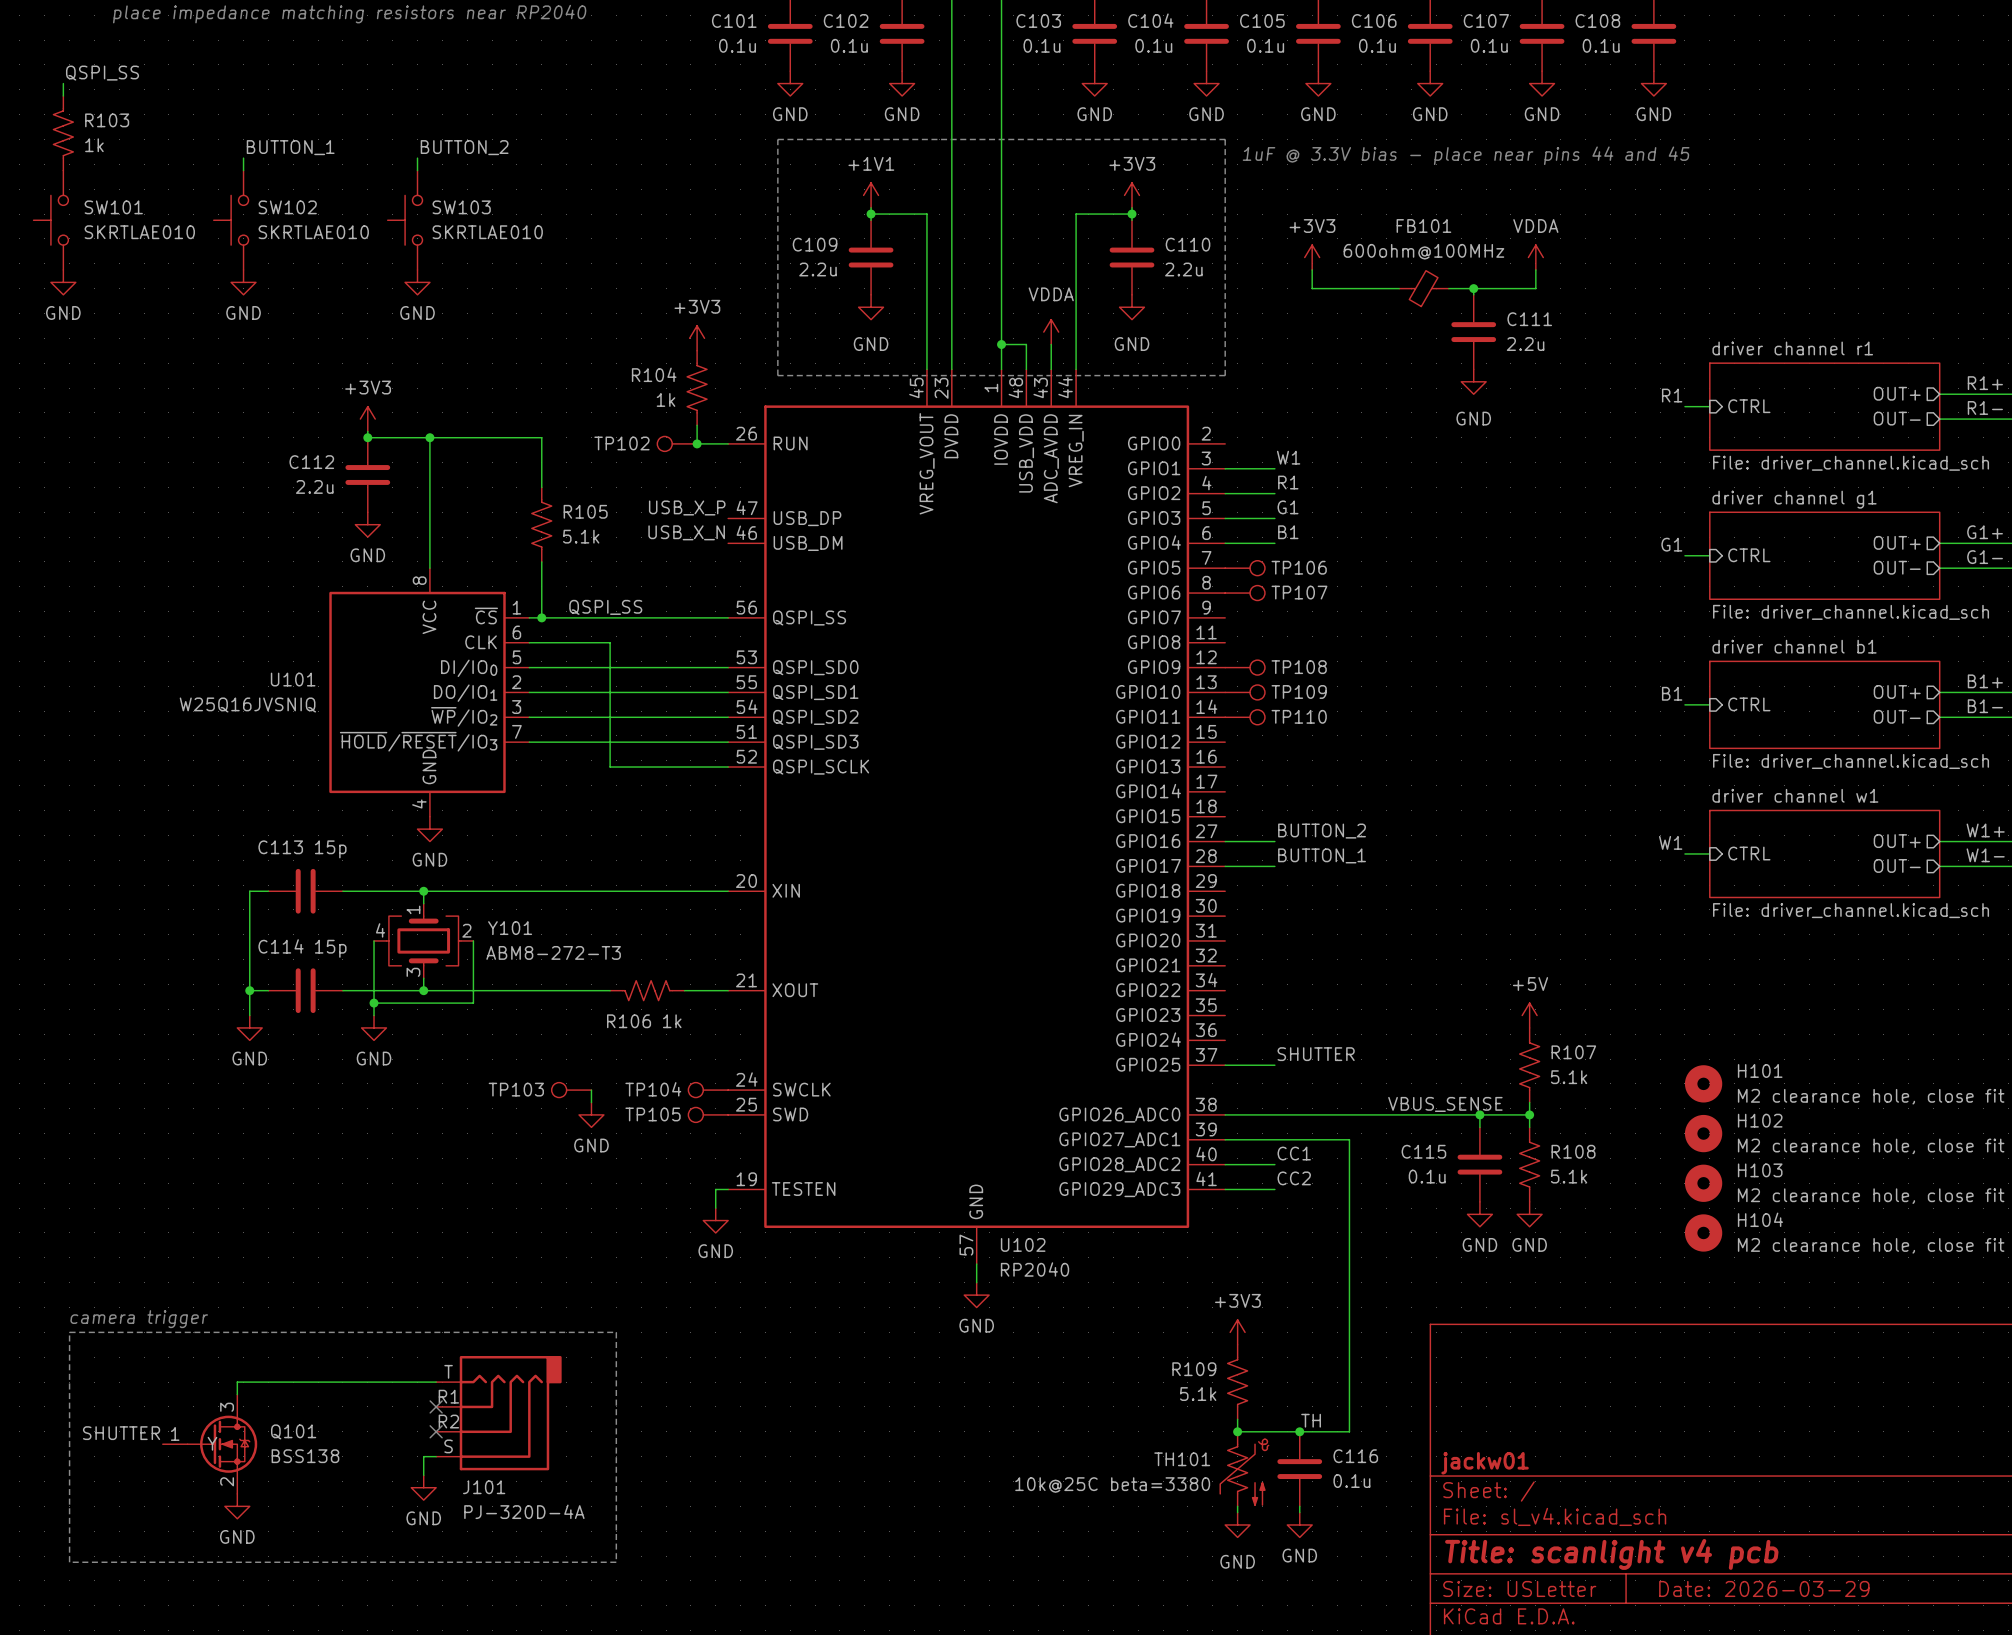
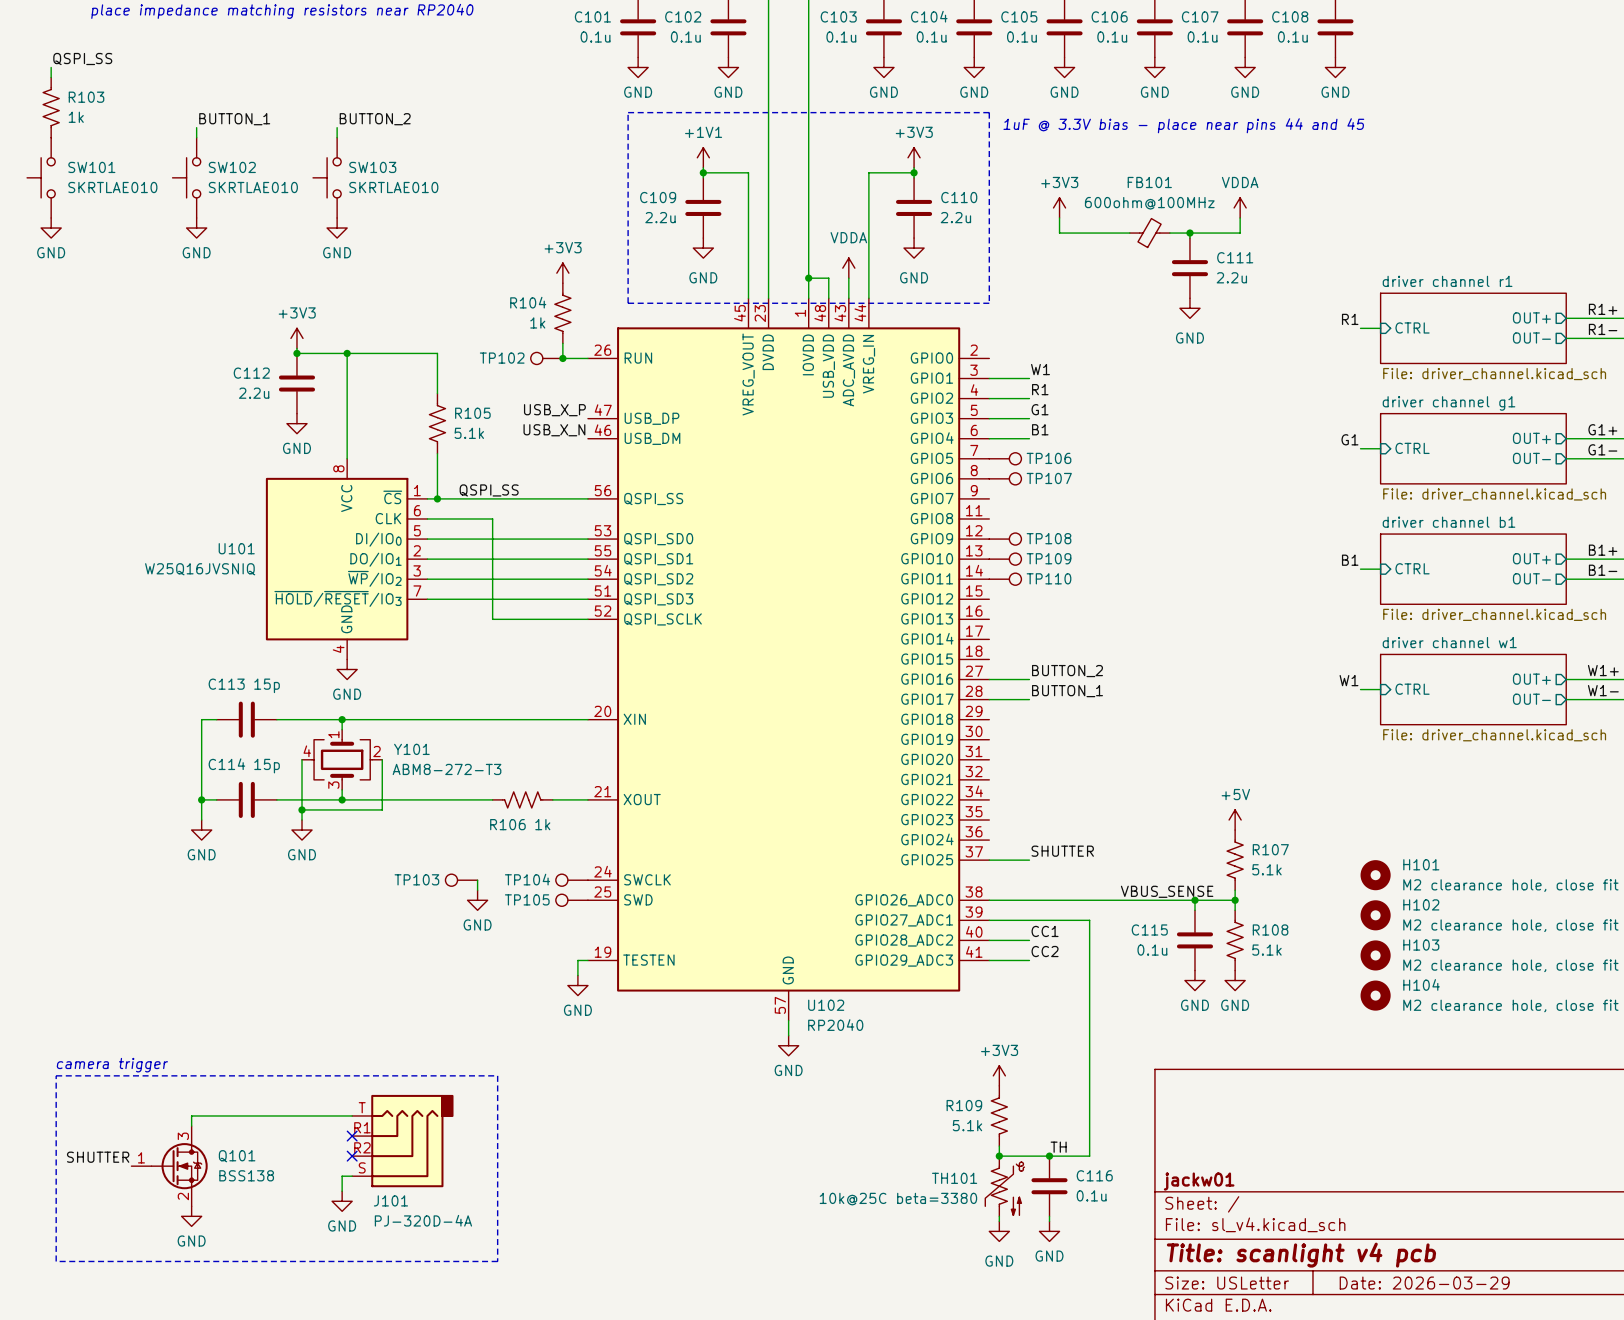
Q101 text: Y (212, 1443) -> none

